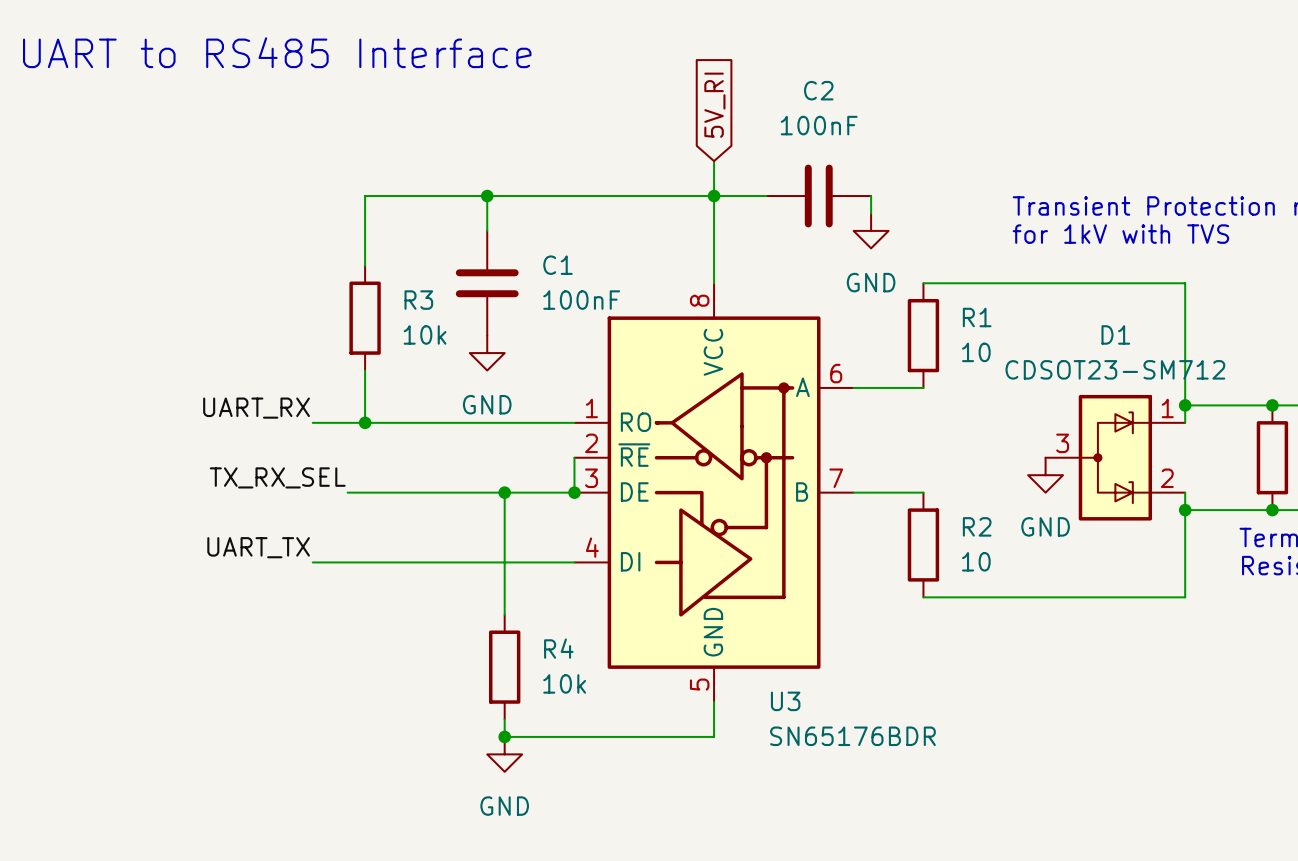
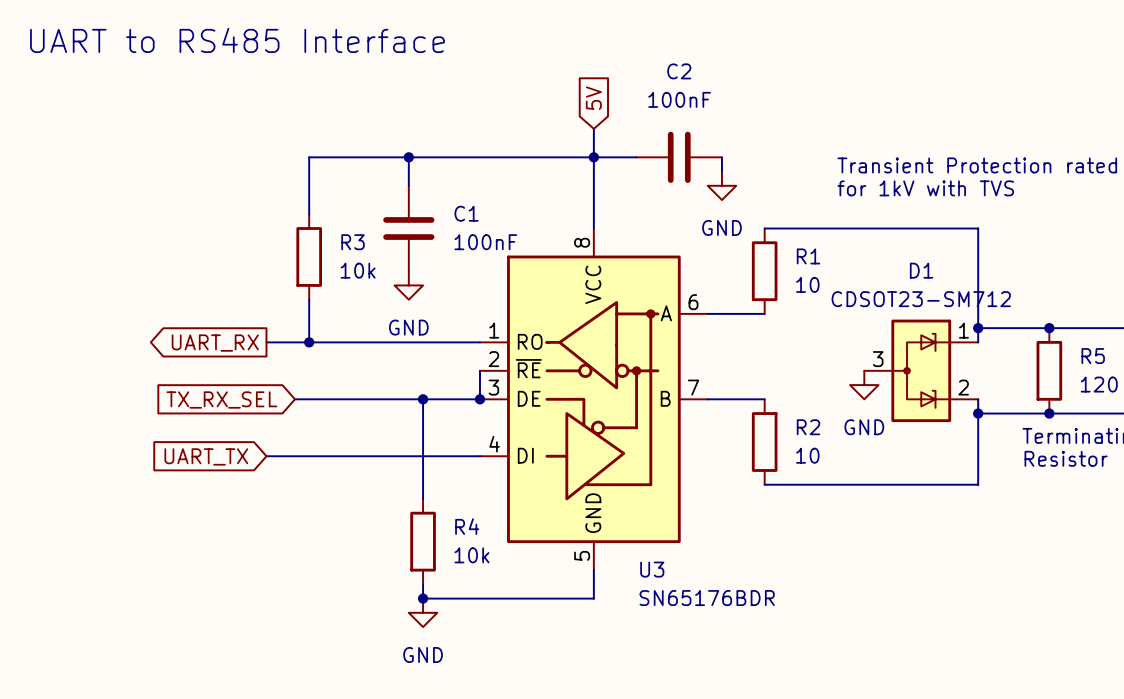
global label: 5V_RI (714, 105) -> 5V (593, 98)
label: UART_RX (256, 408) -> none
global label: none -> UART_RX (215, 343)
label: TX_RX_SEL (277, 477) -> none
global label: none -> TX_RX_SEL (221, 399)
label: UART_TX (258, 547) -> none
global label: none -> UART_TX (206, 456)

